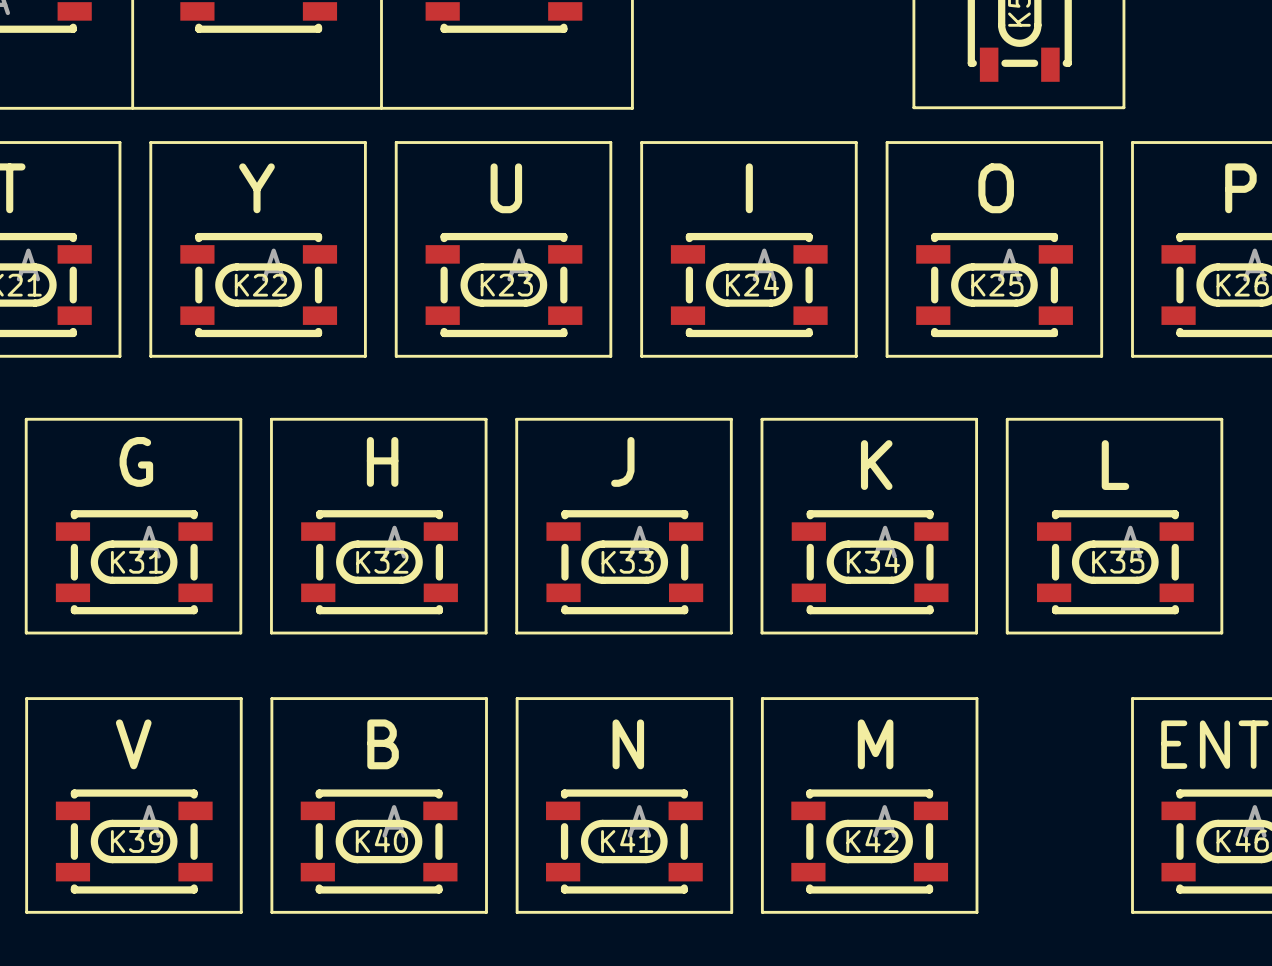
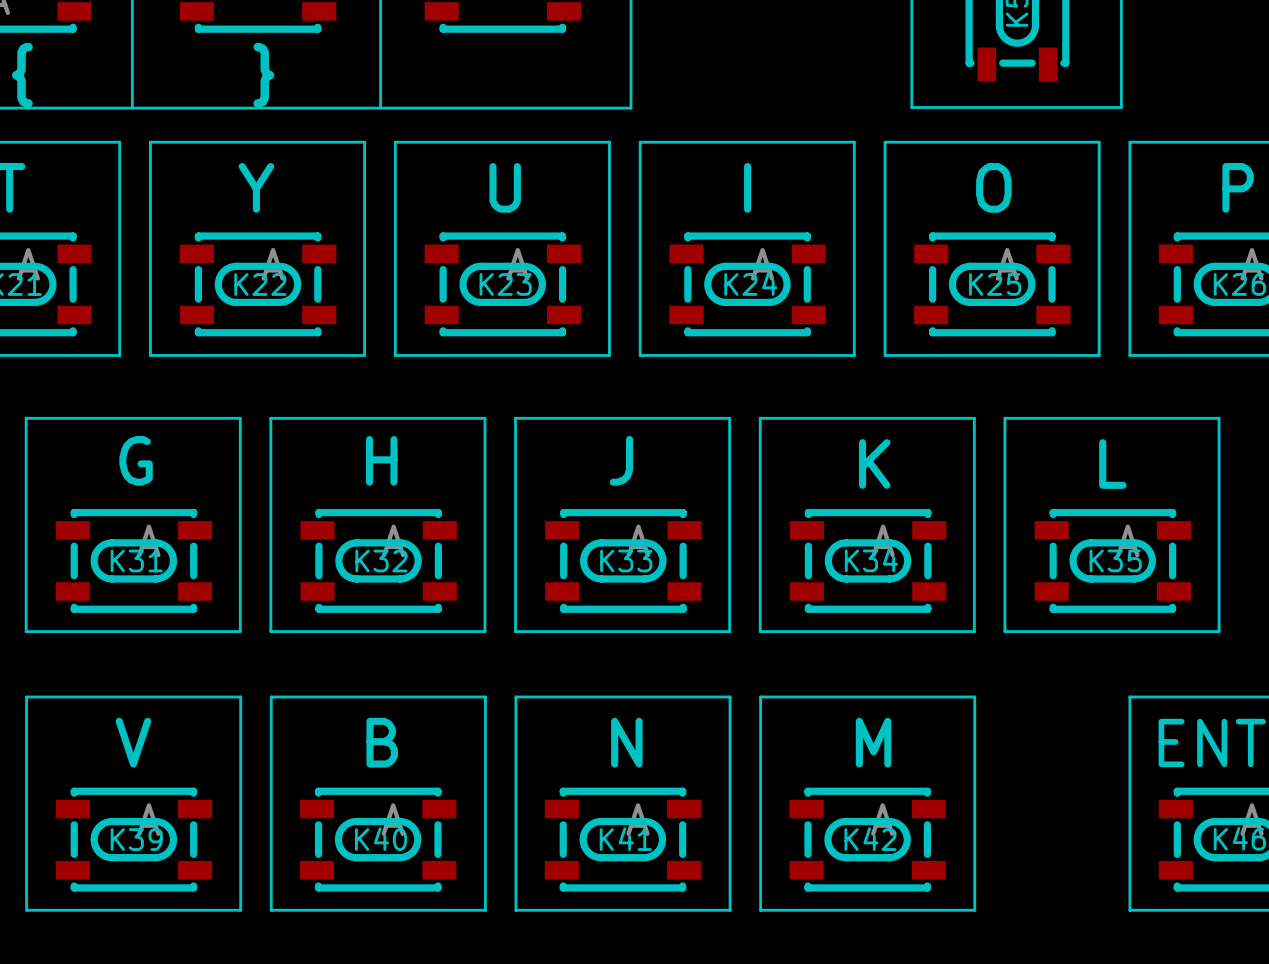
text: none -> { (22, 75)
text: none -> } (263, 75)

